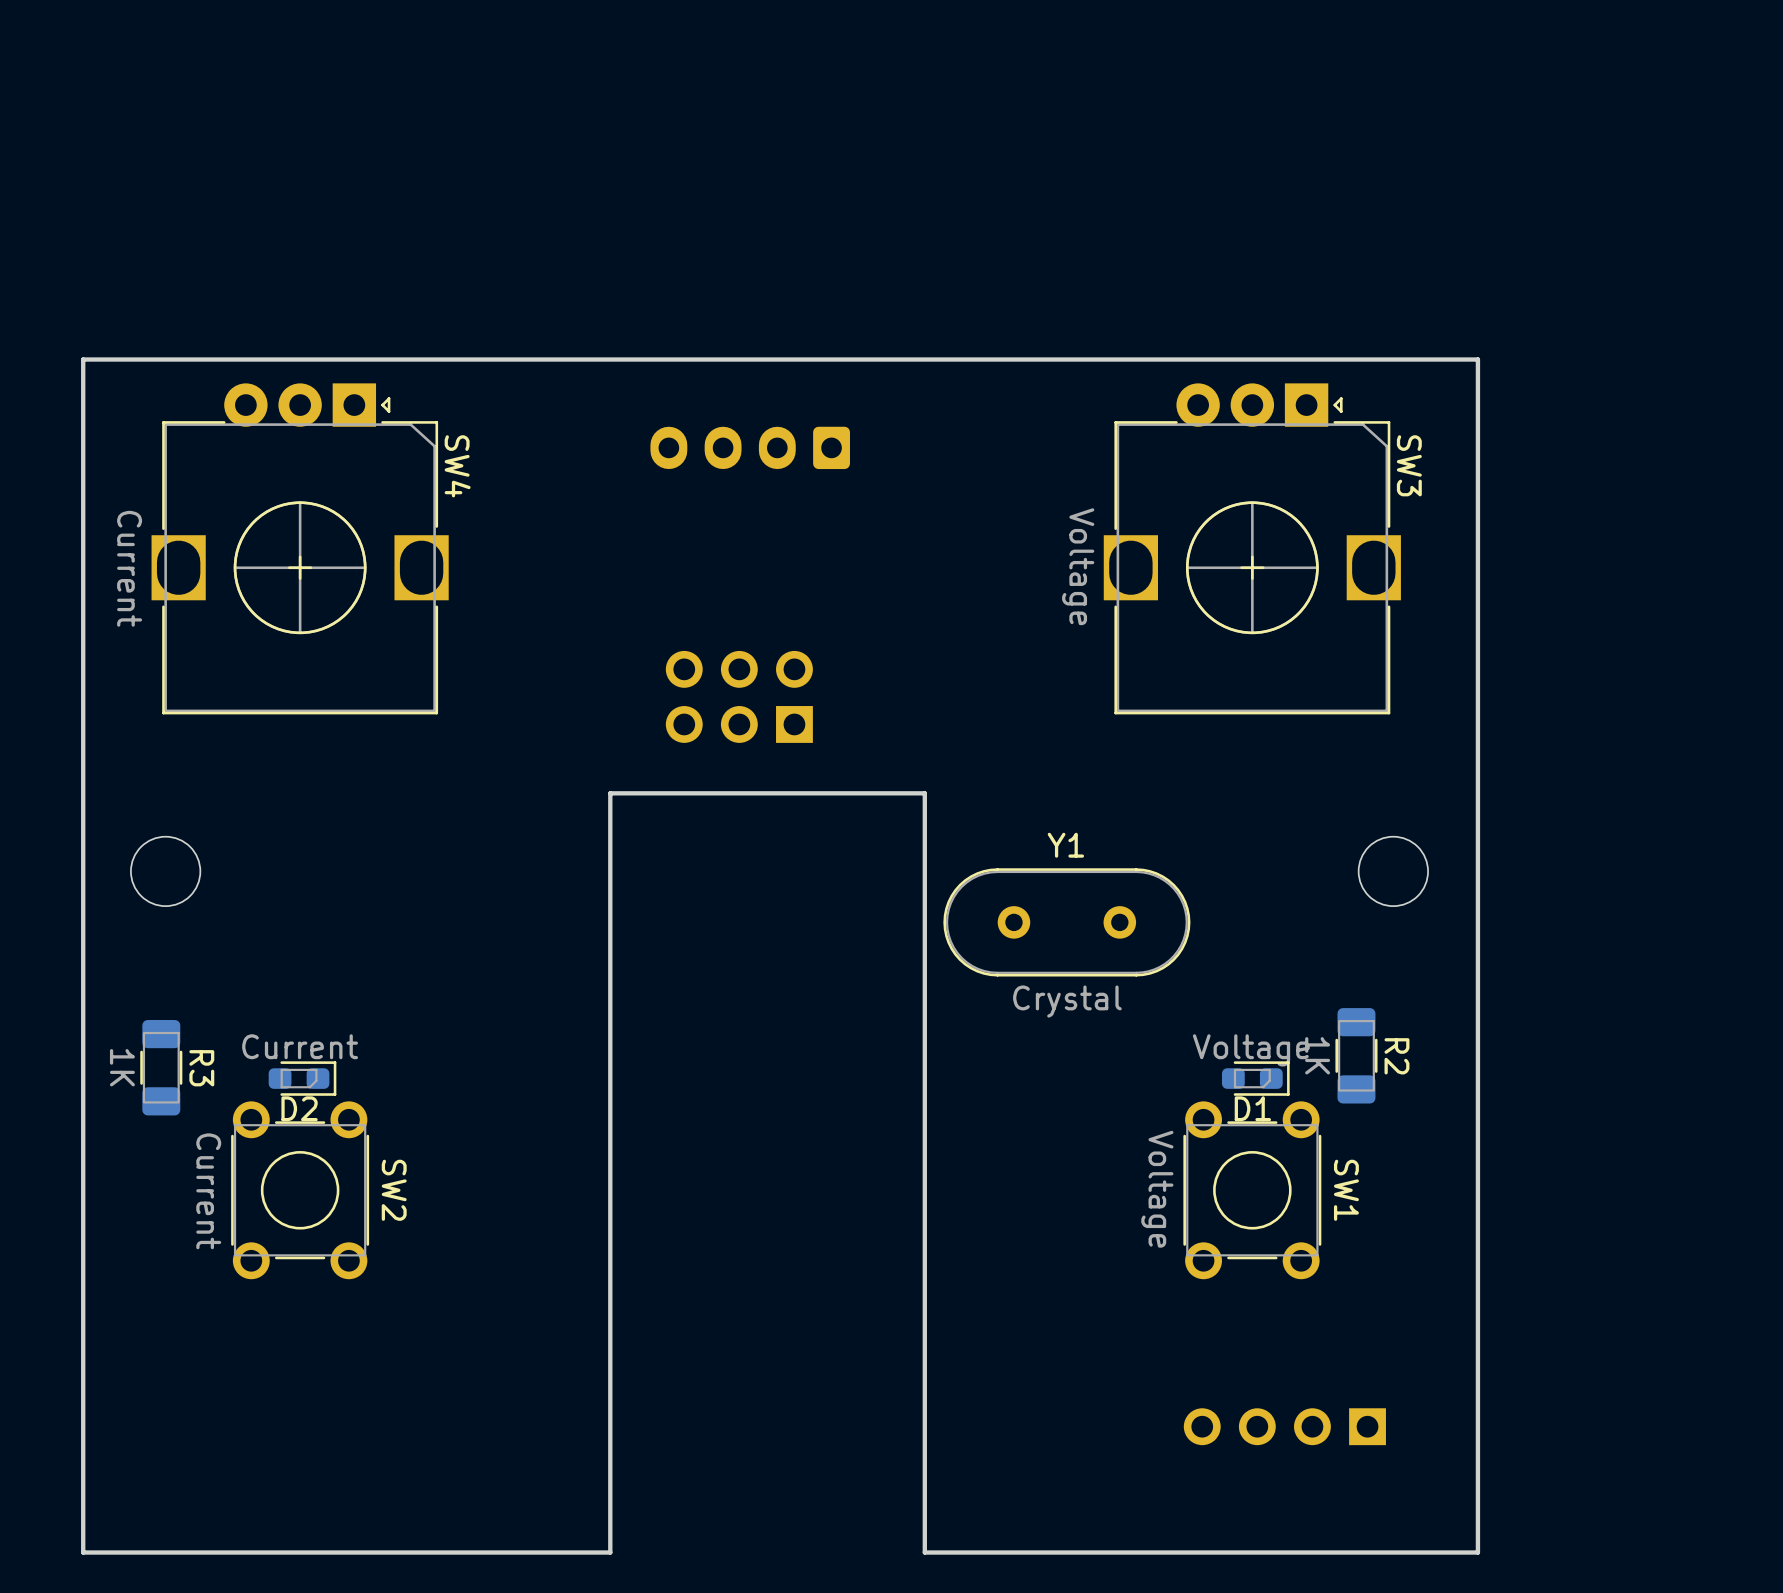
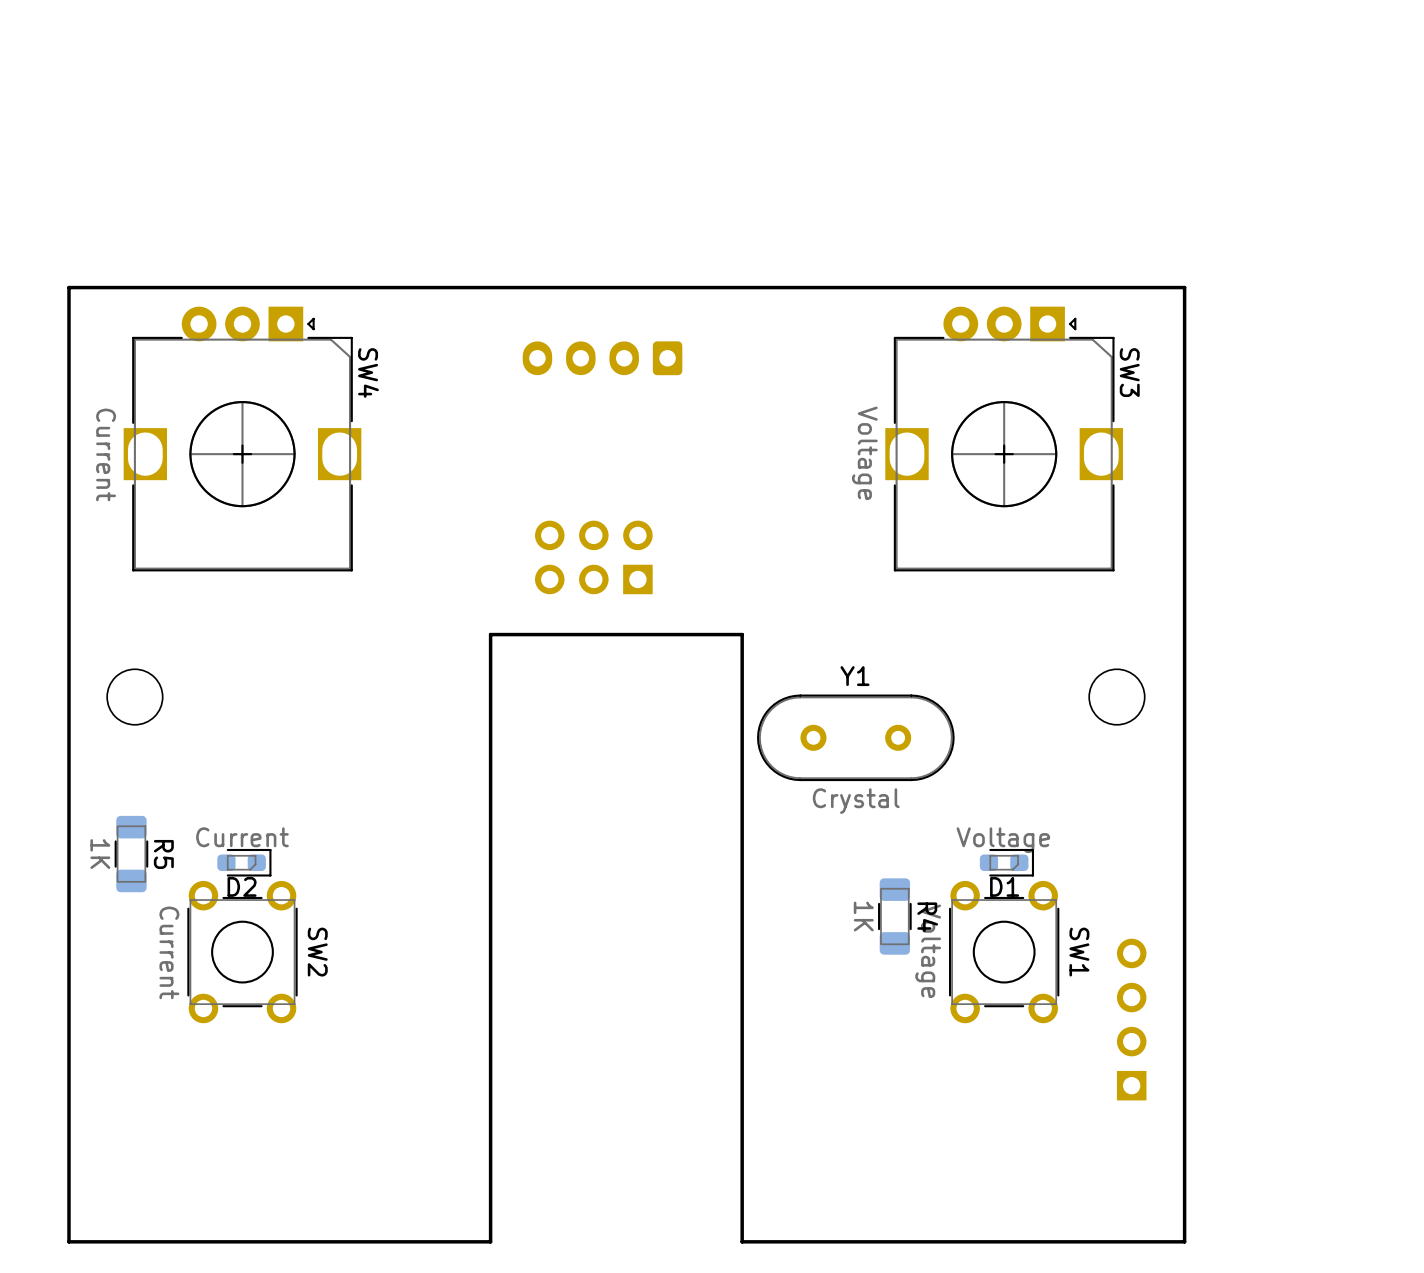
R2: 1K (1356, 1055) -> none
R3 name: R3 (201, 1068) -> R5 (163, 854)
R4: none -> 1K (894, 916)
part rotation: 0° (1284, 1426) -> 90° clockwise (1131, 1019)
part position: (1284, 1426) -> (1131, 1019)

